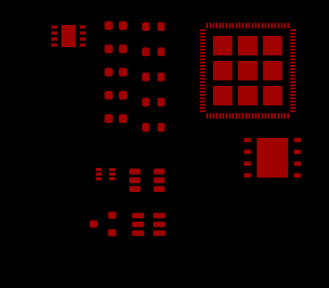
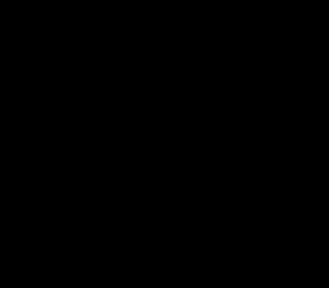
part: (115, 25) -> none
part: (153, 26) -> none
part: (68, 36) -> none
part: (115, 48) -> none
part: (153, 51) -> none
part: (247, 70) -> none
part: (115, 72) -> none
part: (153, 76) -> none
part: (115, 95) -> none
part: (153, 102) -> none
part: (115, 118) -> none
part: (153, 127) -> none
part: (272, 157) -> none
part: (105, 174) -> none
part: (146, 180) -> none
part: (102, 223) -> none
part: (148, 224) -> none

